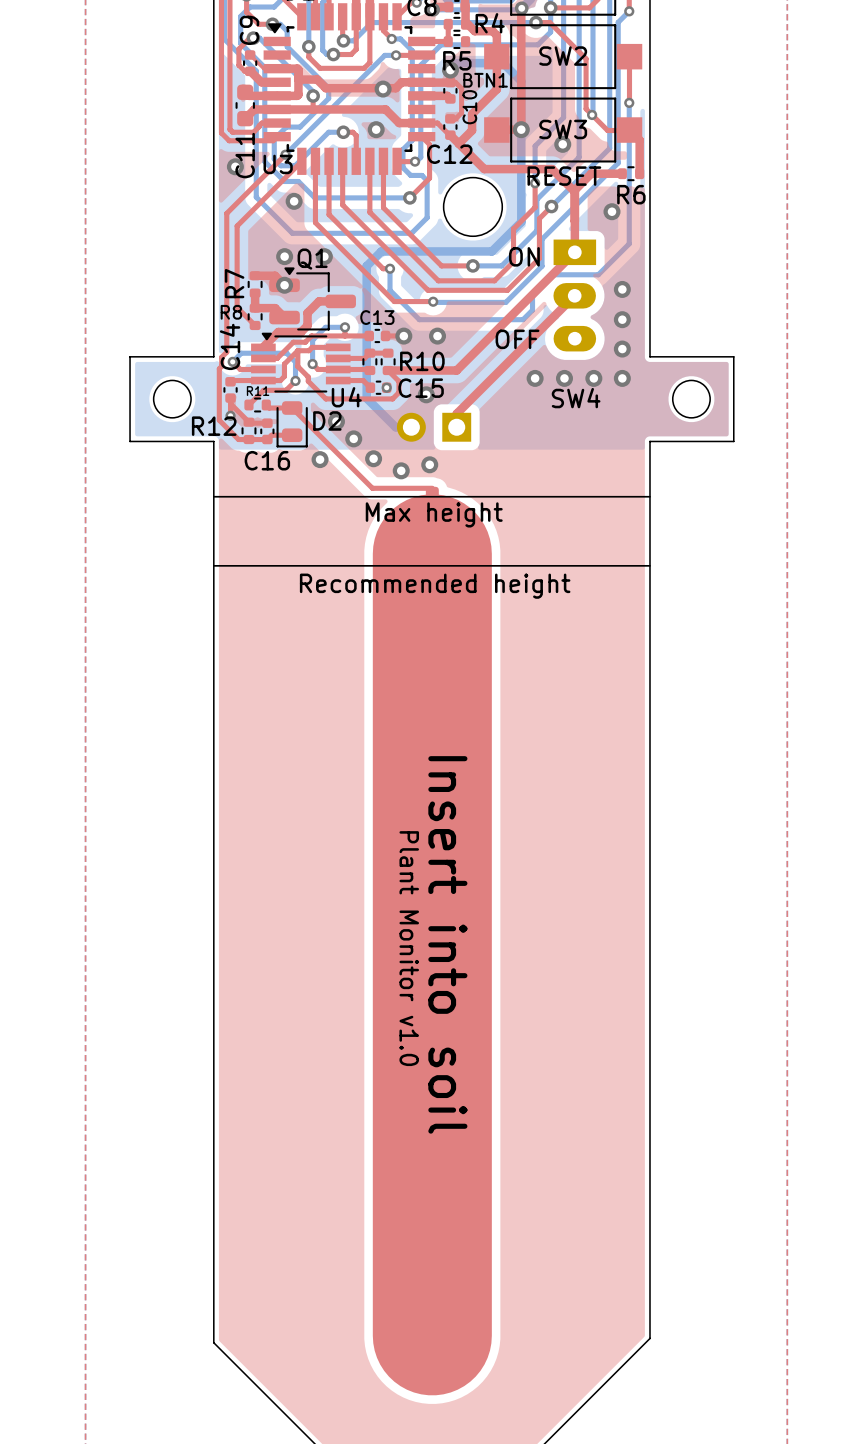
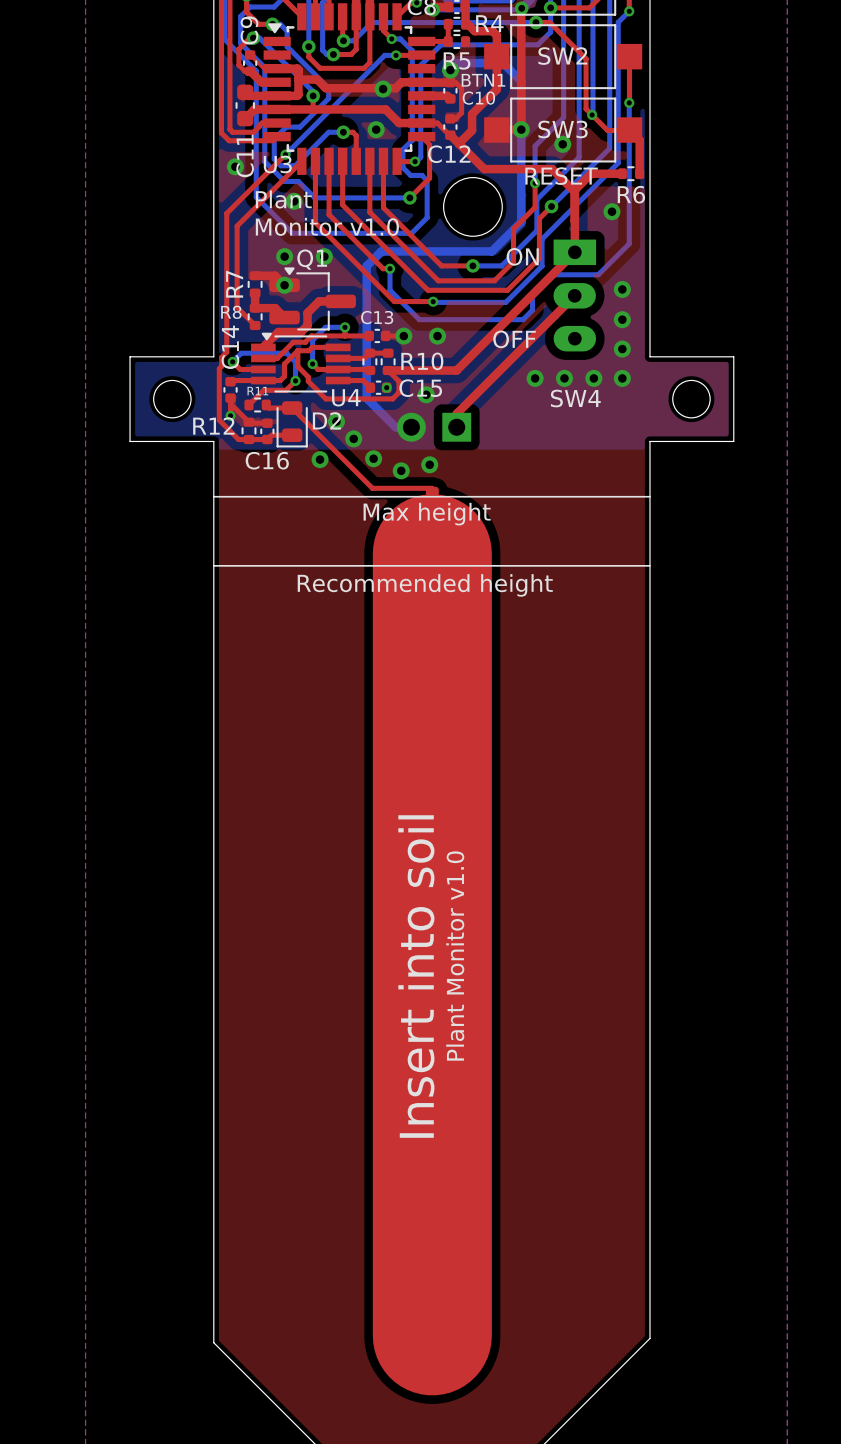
C10 name rotation: 0° (469, 107) -> 90° clockwise (478, 98)
text: none -> Plant (283, 199)
text: none -> Monitor v1.0 (327, 226)
text rotation: 0° (447, 944) -> 180° (416, 976)
text rotation: 0° (409, 948) -> 180° (455, 956)

